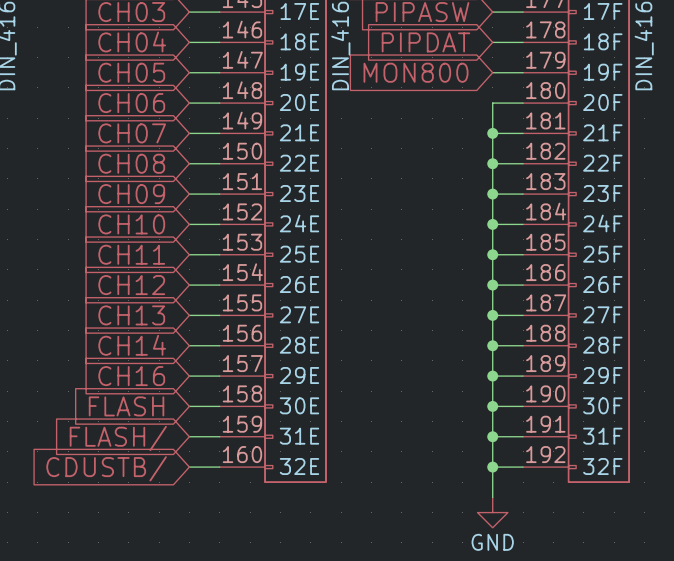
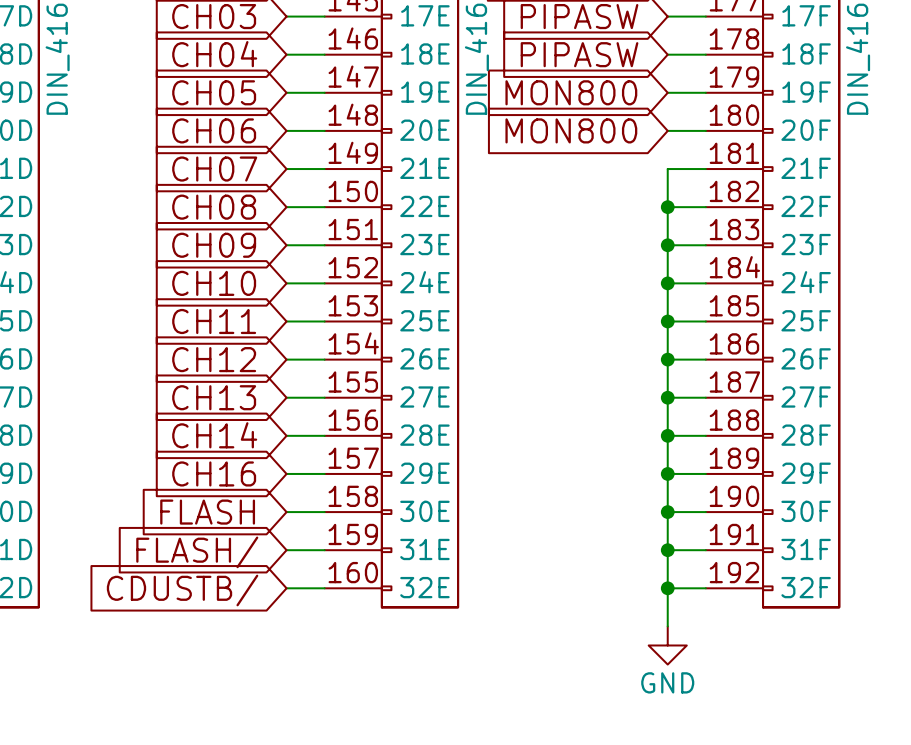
global label: PIPDAT (425, 42) -> PIPASW (579, 54)
global label: none -> MON800 (571, 130)
wire: (492, 103) (492, 133) -> none
junction: (492, 133) -> none

